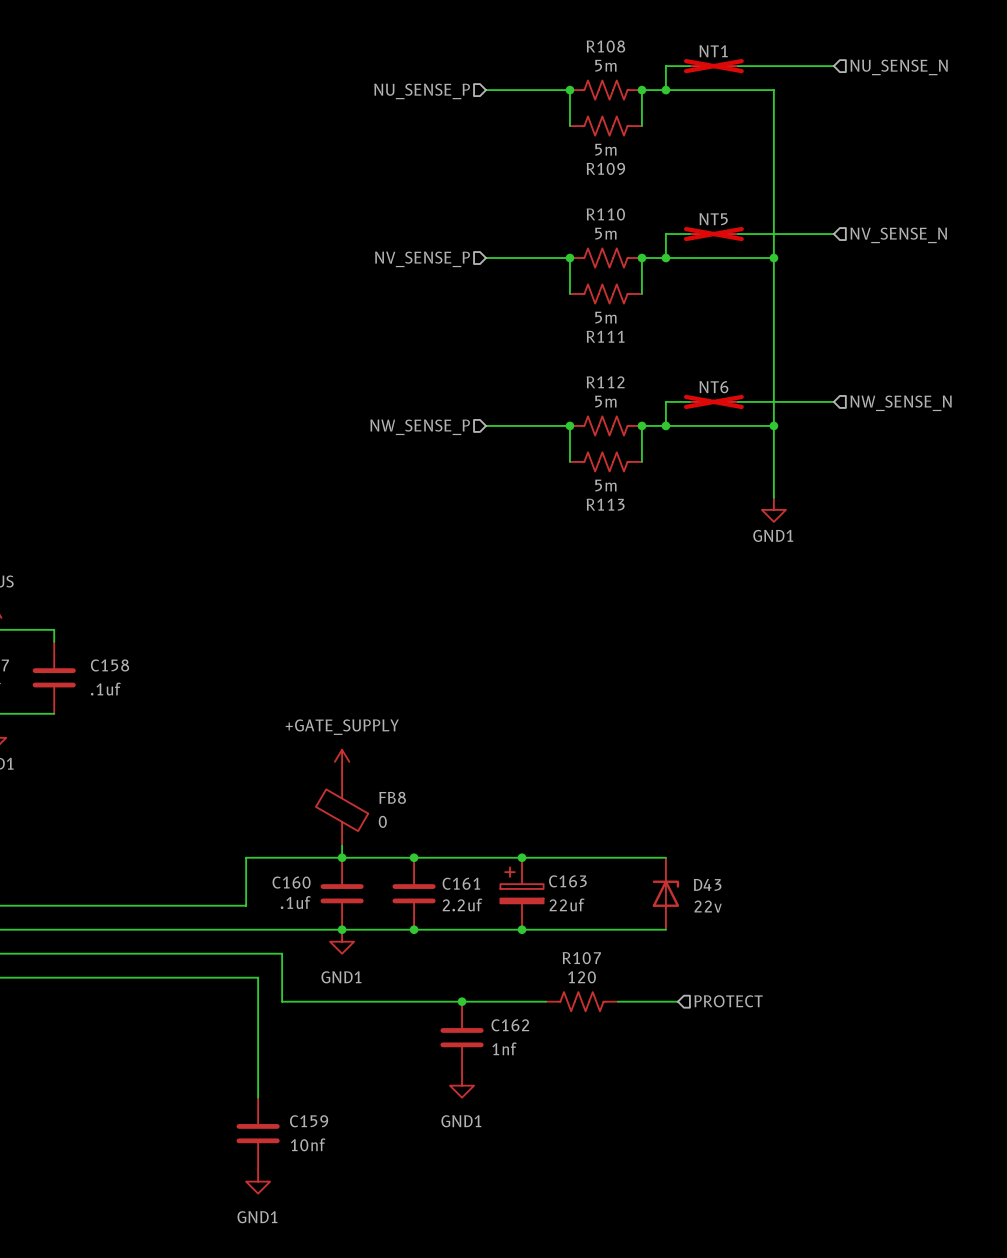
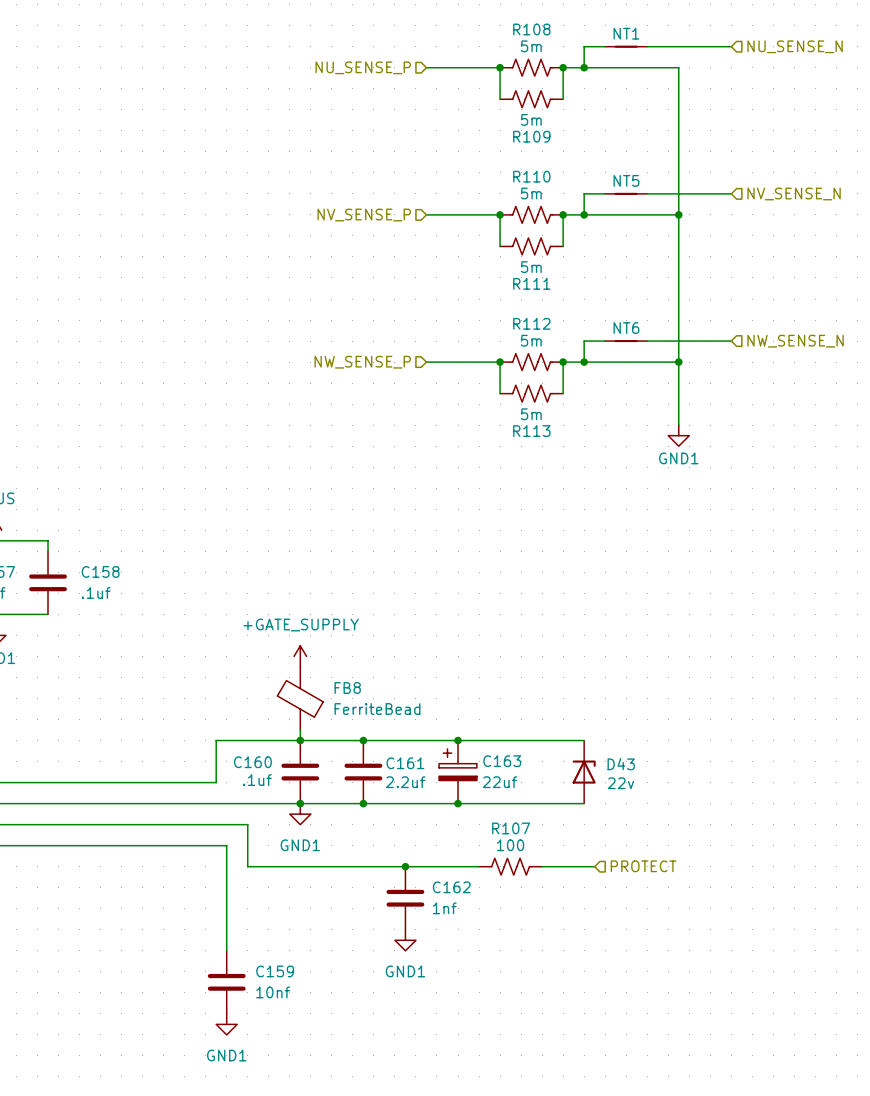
NT1 do-not-place cross: (713, 66) -> none
NT5 do-not-place cross: (713, 234) -> none
NT6 do-not-place cross: (713, 401) -> none
FB8 value: 0 (382, 821) -> FerriteBead (377, 709)
R107 value: 120 (582, 977) -> 100 (510, 845)

